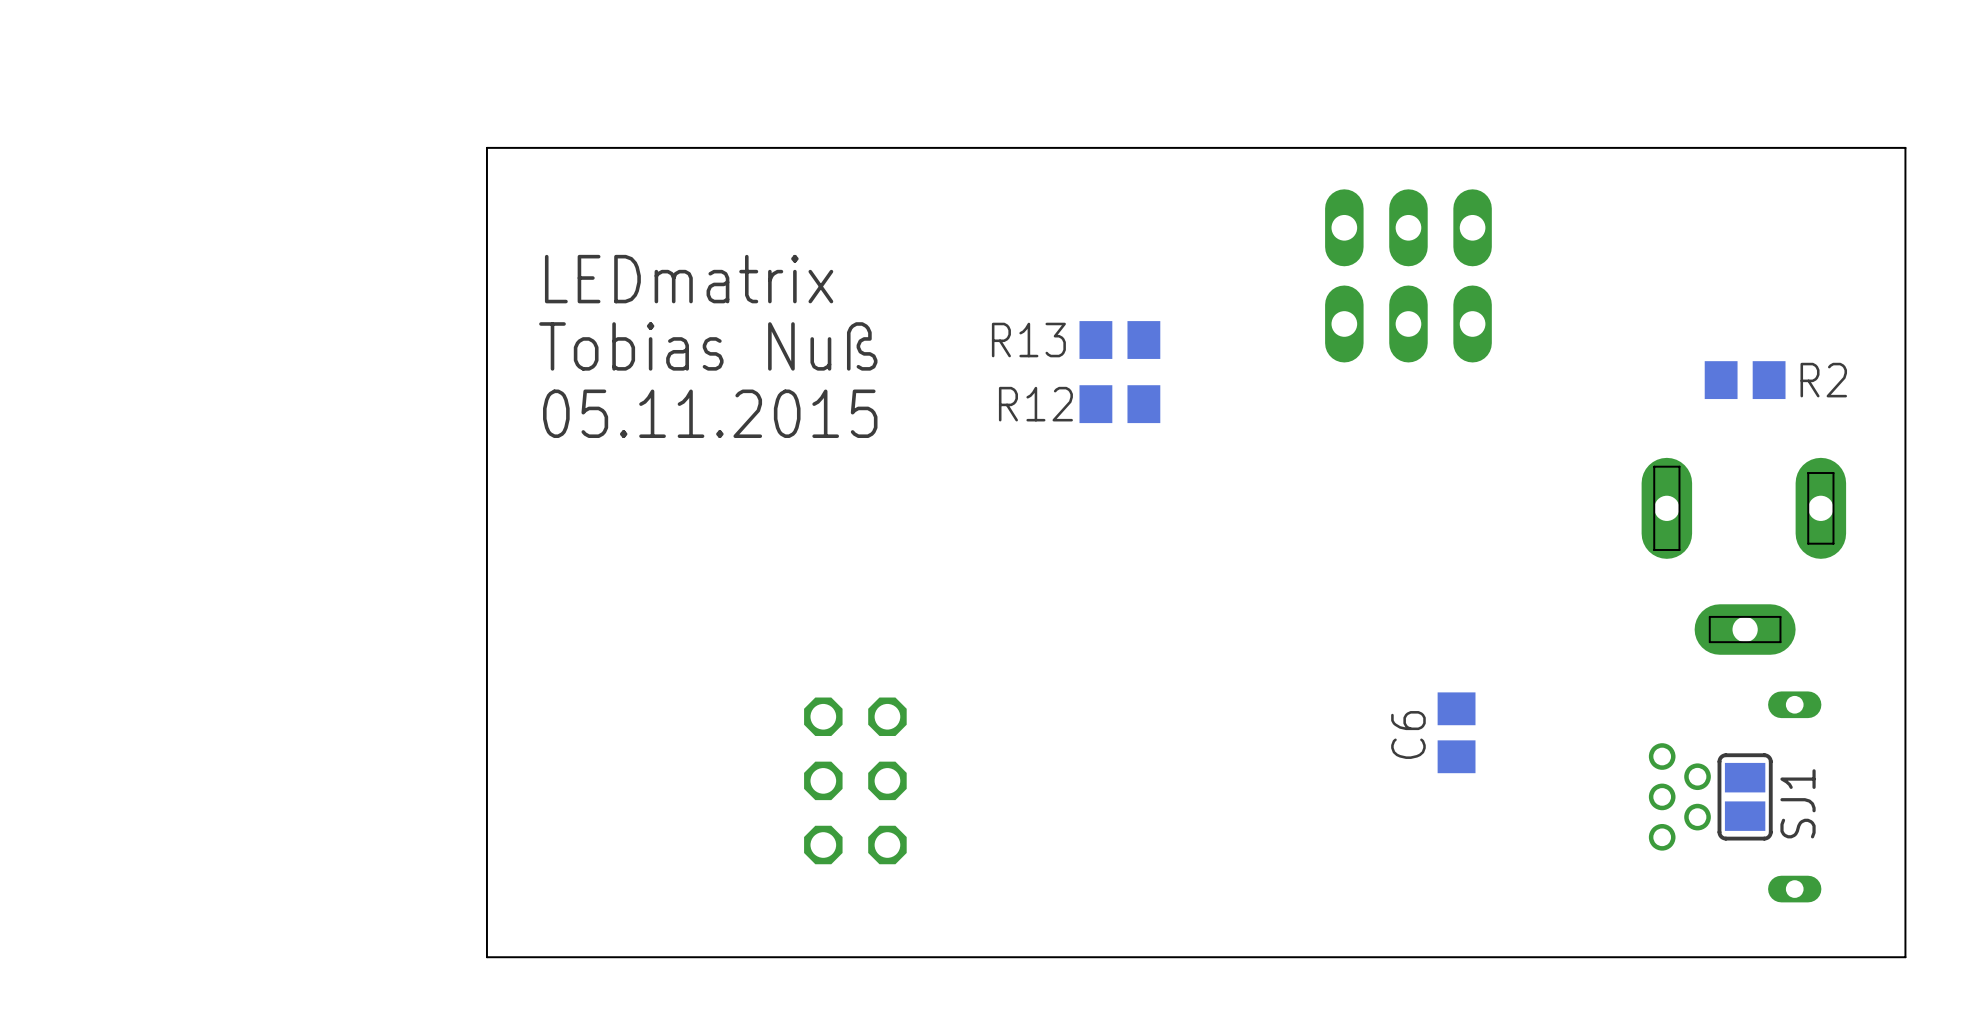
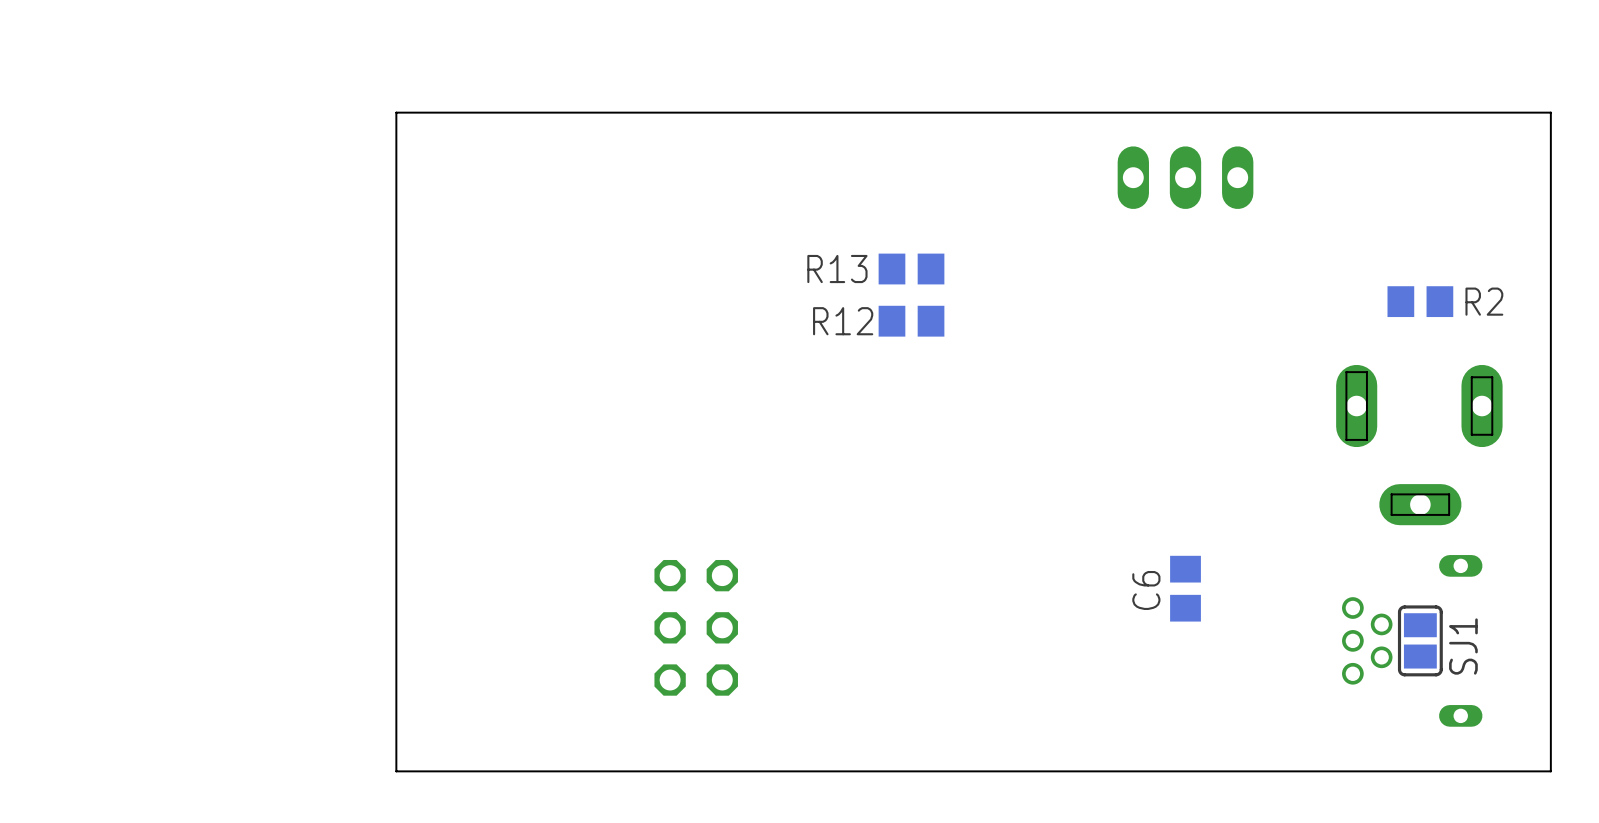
part position: (1408, 227) -> (1185, 177)
text: LEDmatrix (689, 279) -> none
part: (1408, 323) -> none
text: Tobias Nuß (708, 346) -> none
text: 05.11.2015 (710, 413) -> none

